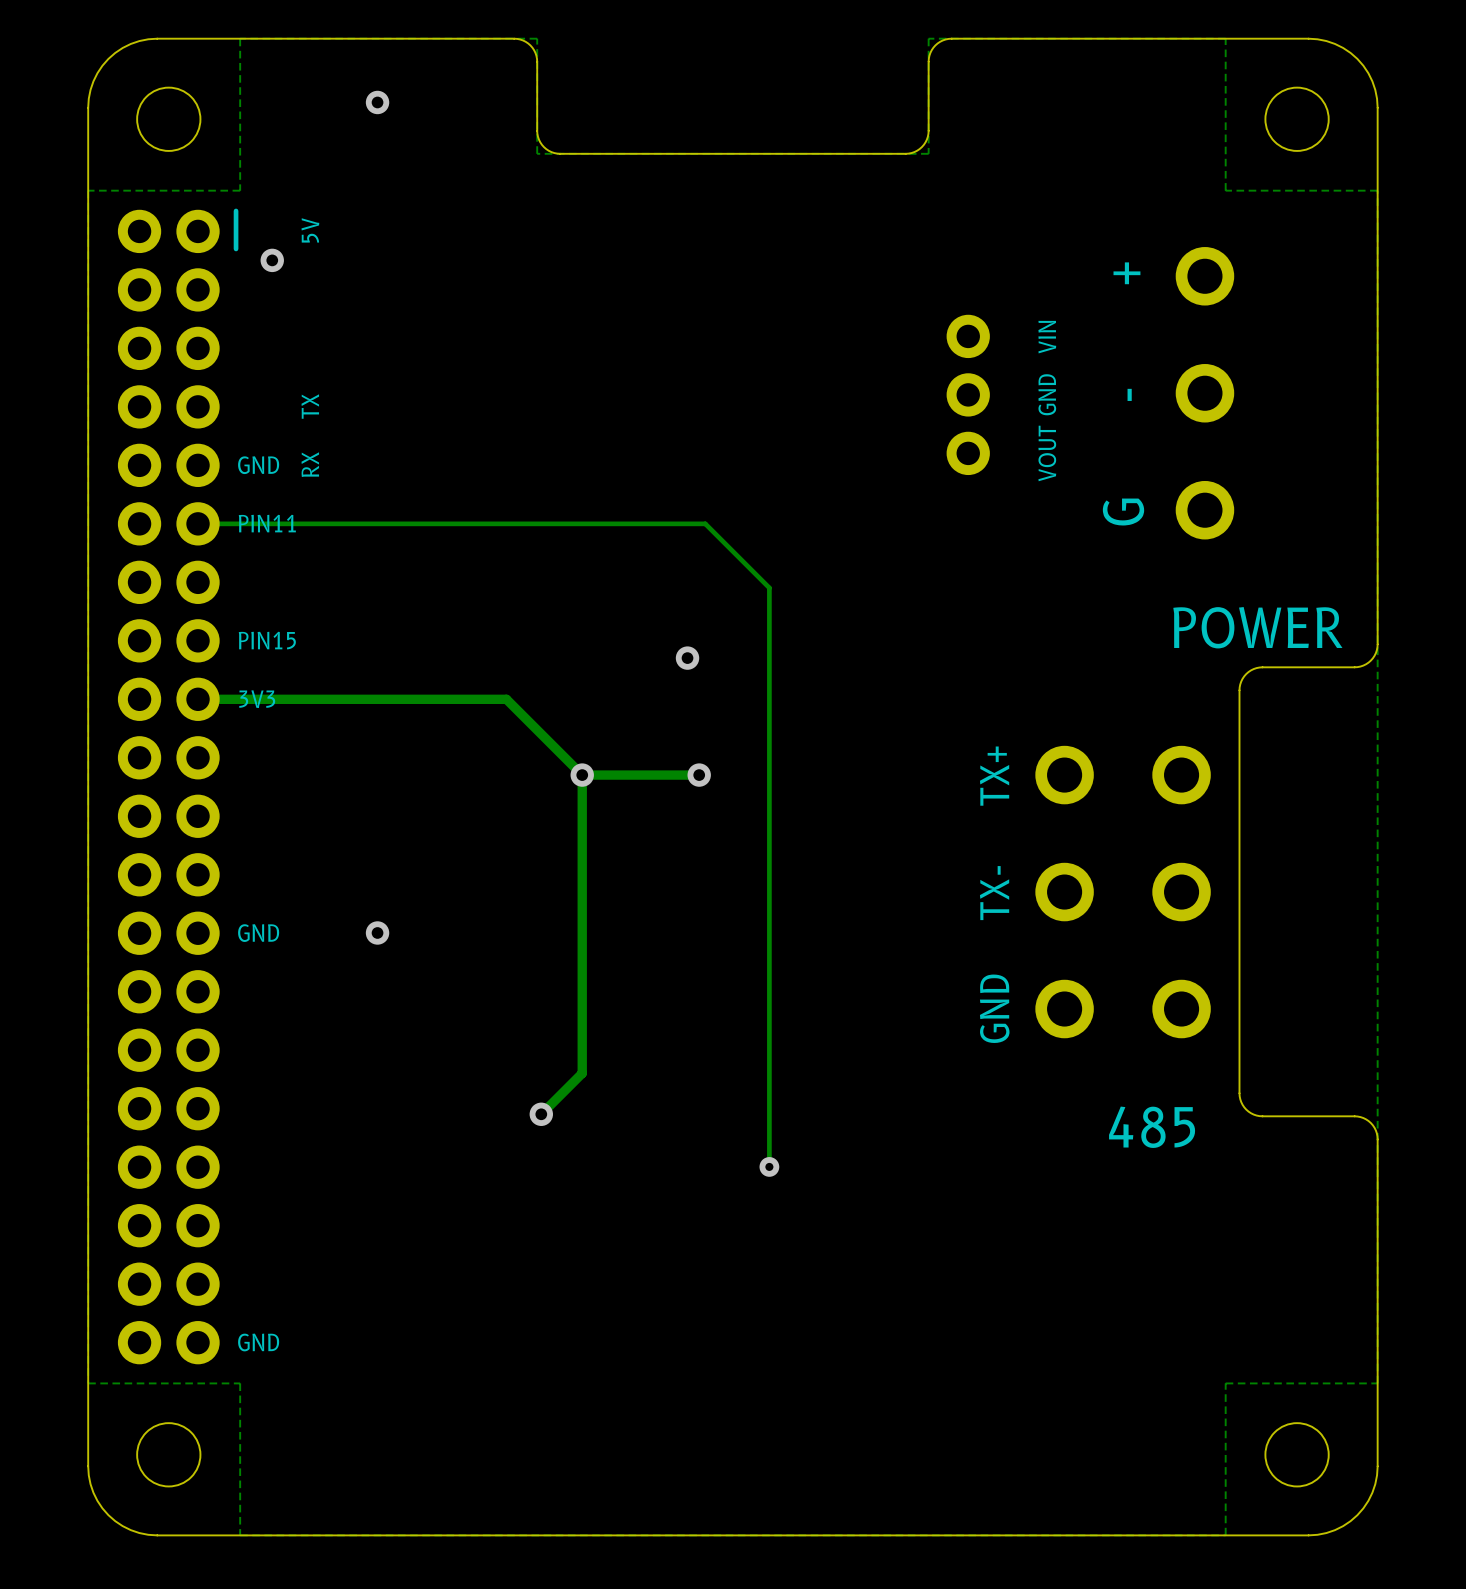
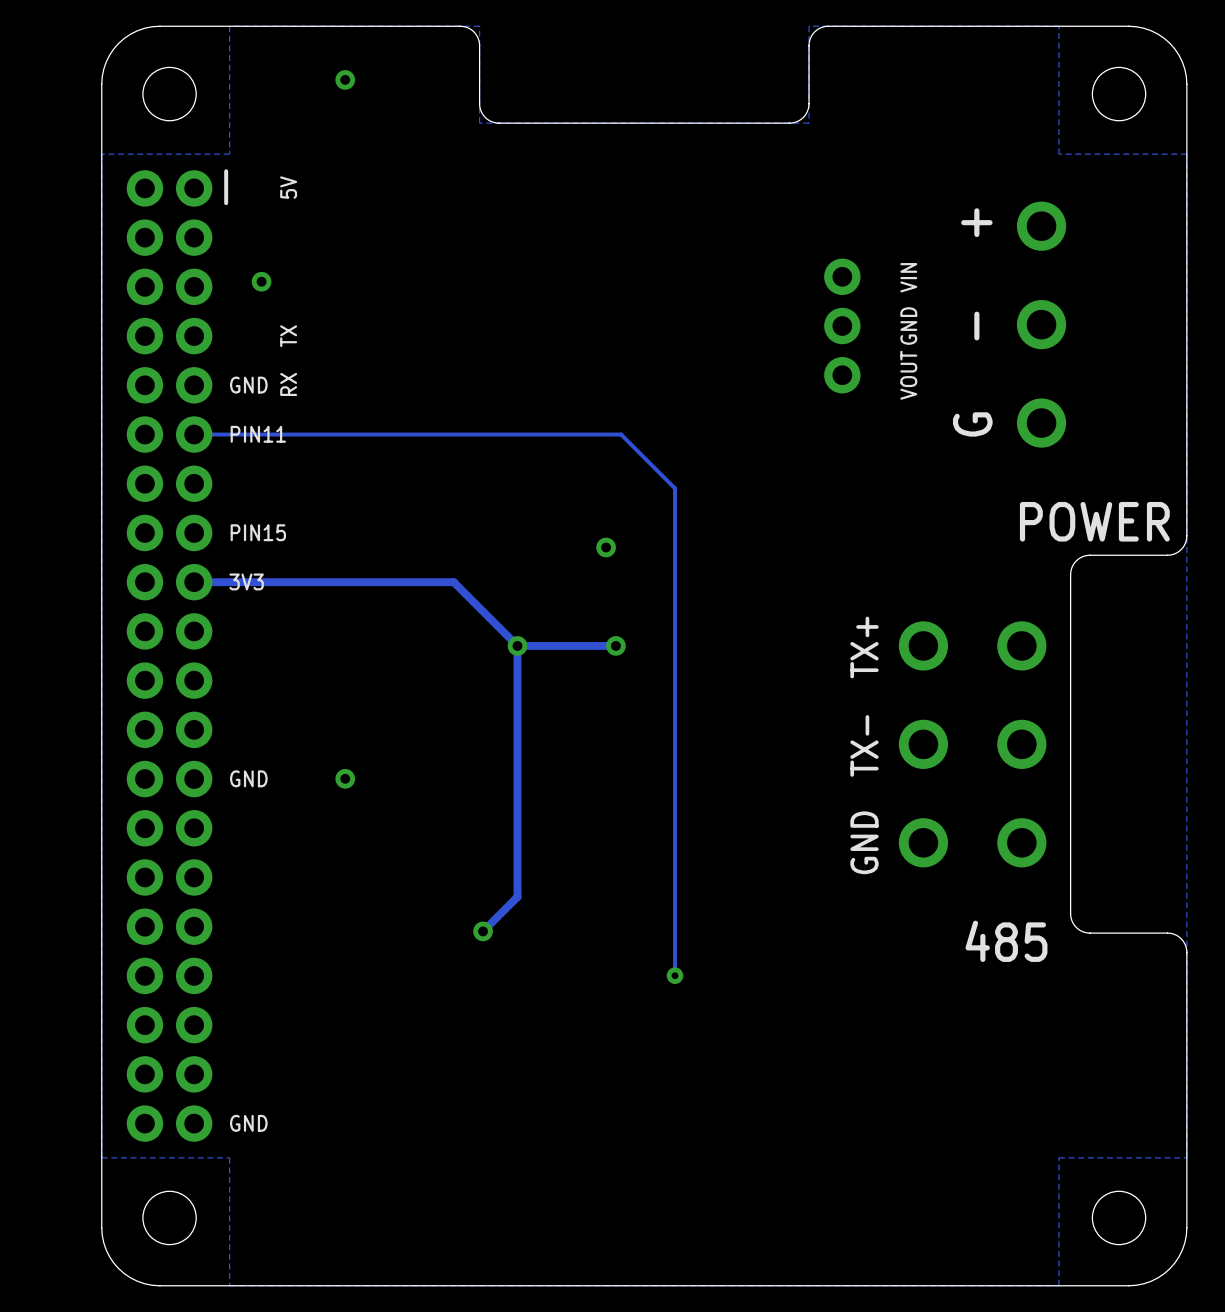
via position: (272, 260) -> (261, 281)

